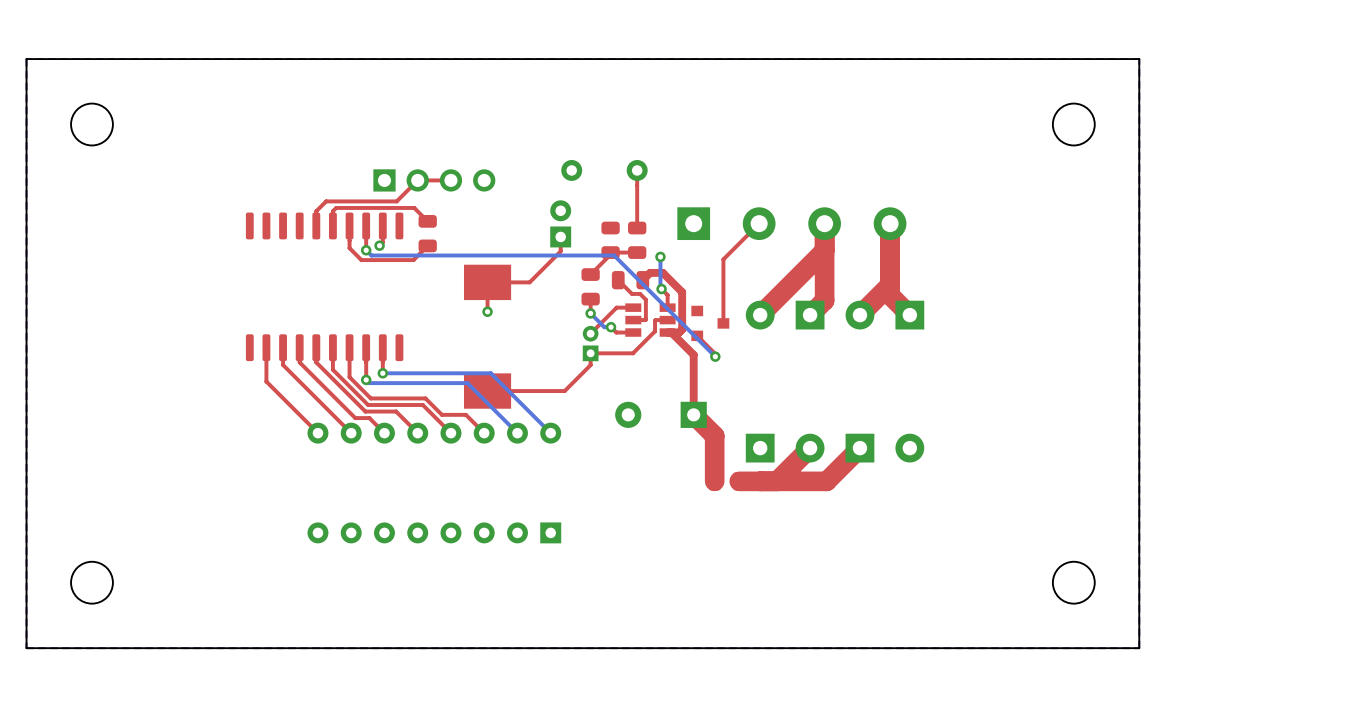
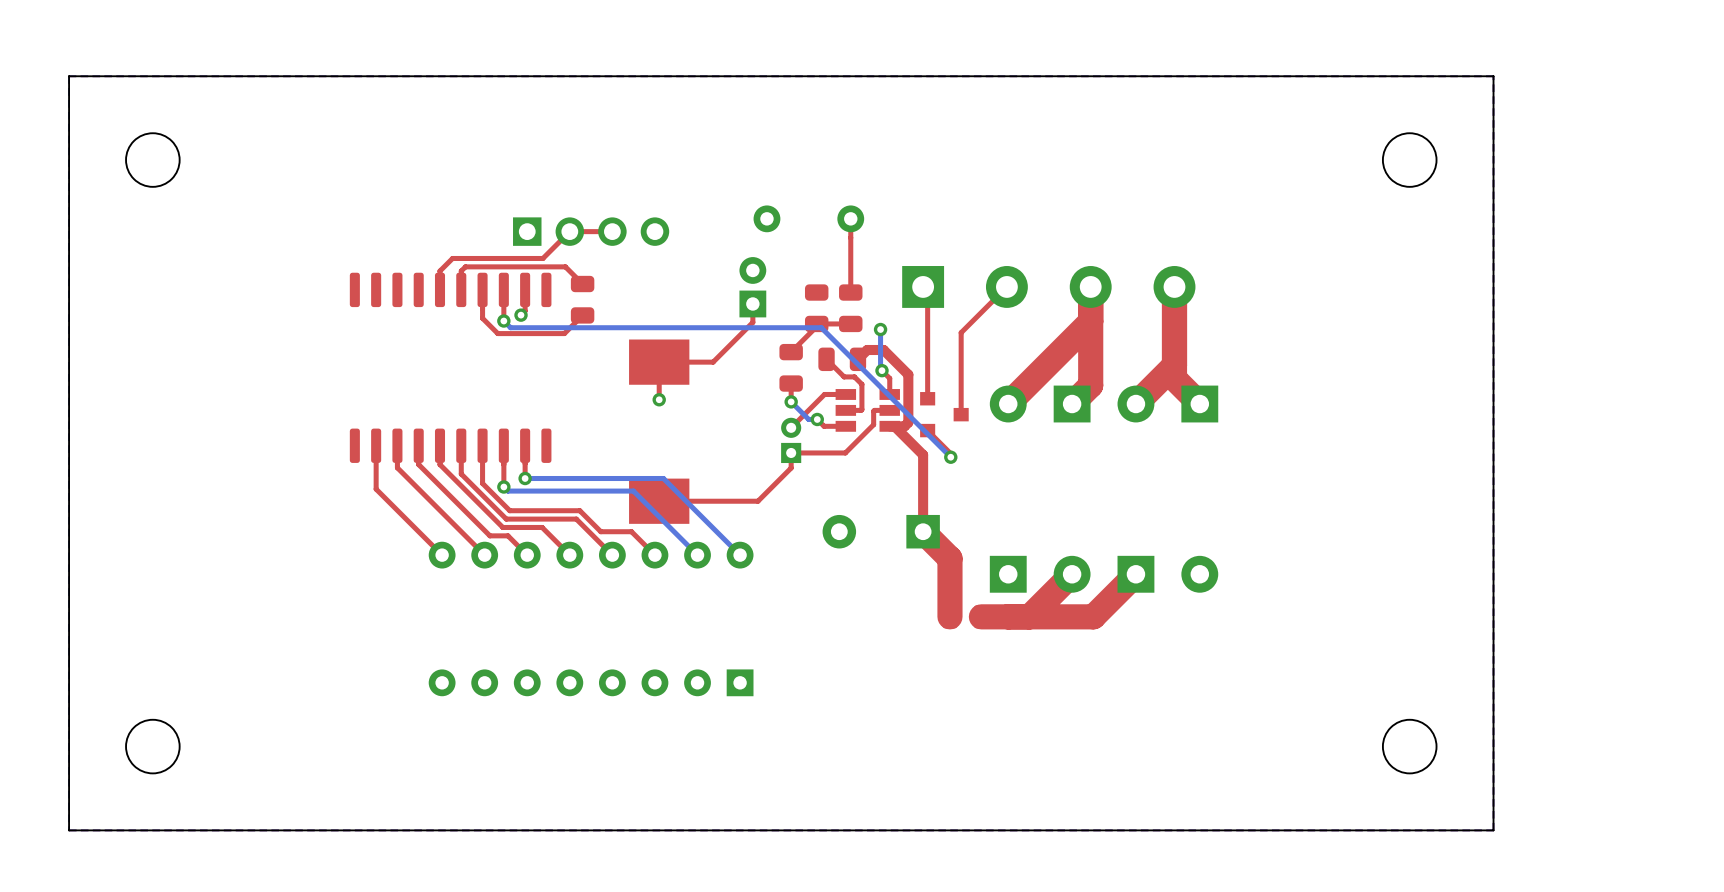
top track: none -> (927, 291) (927, 398)

